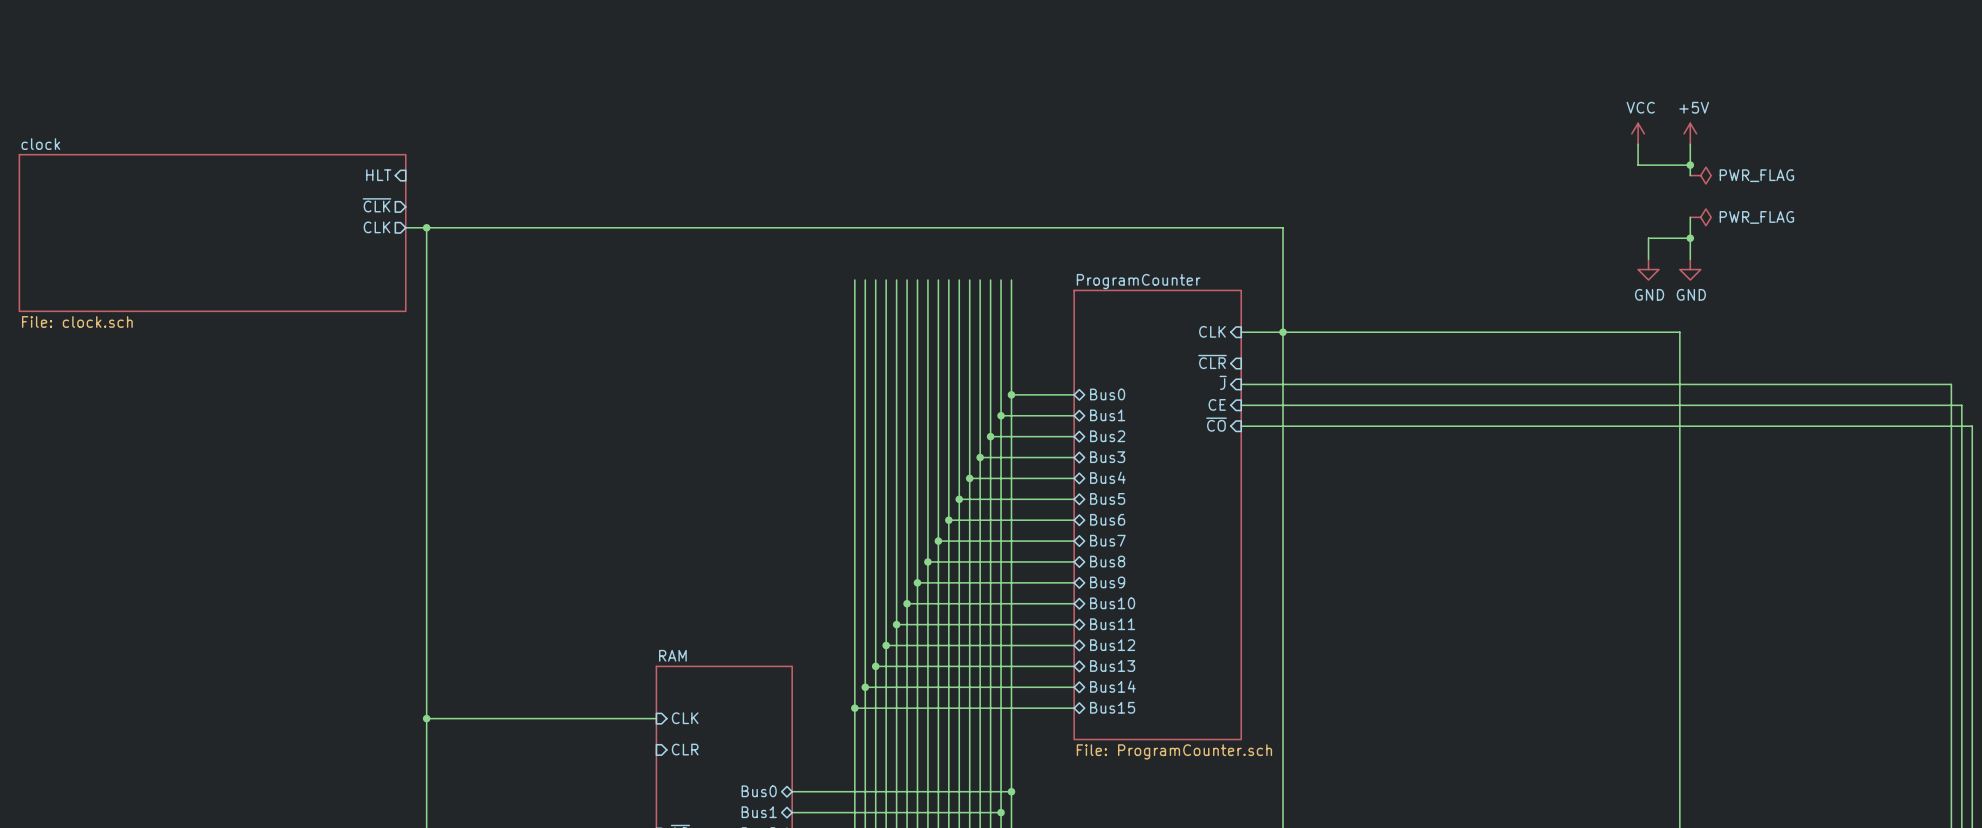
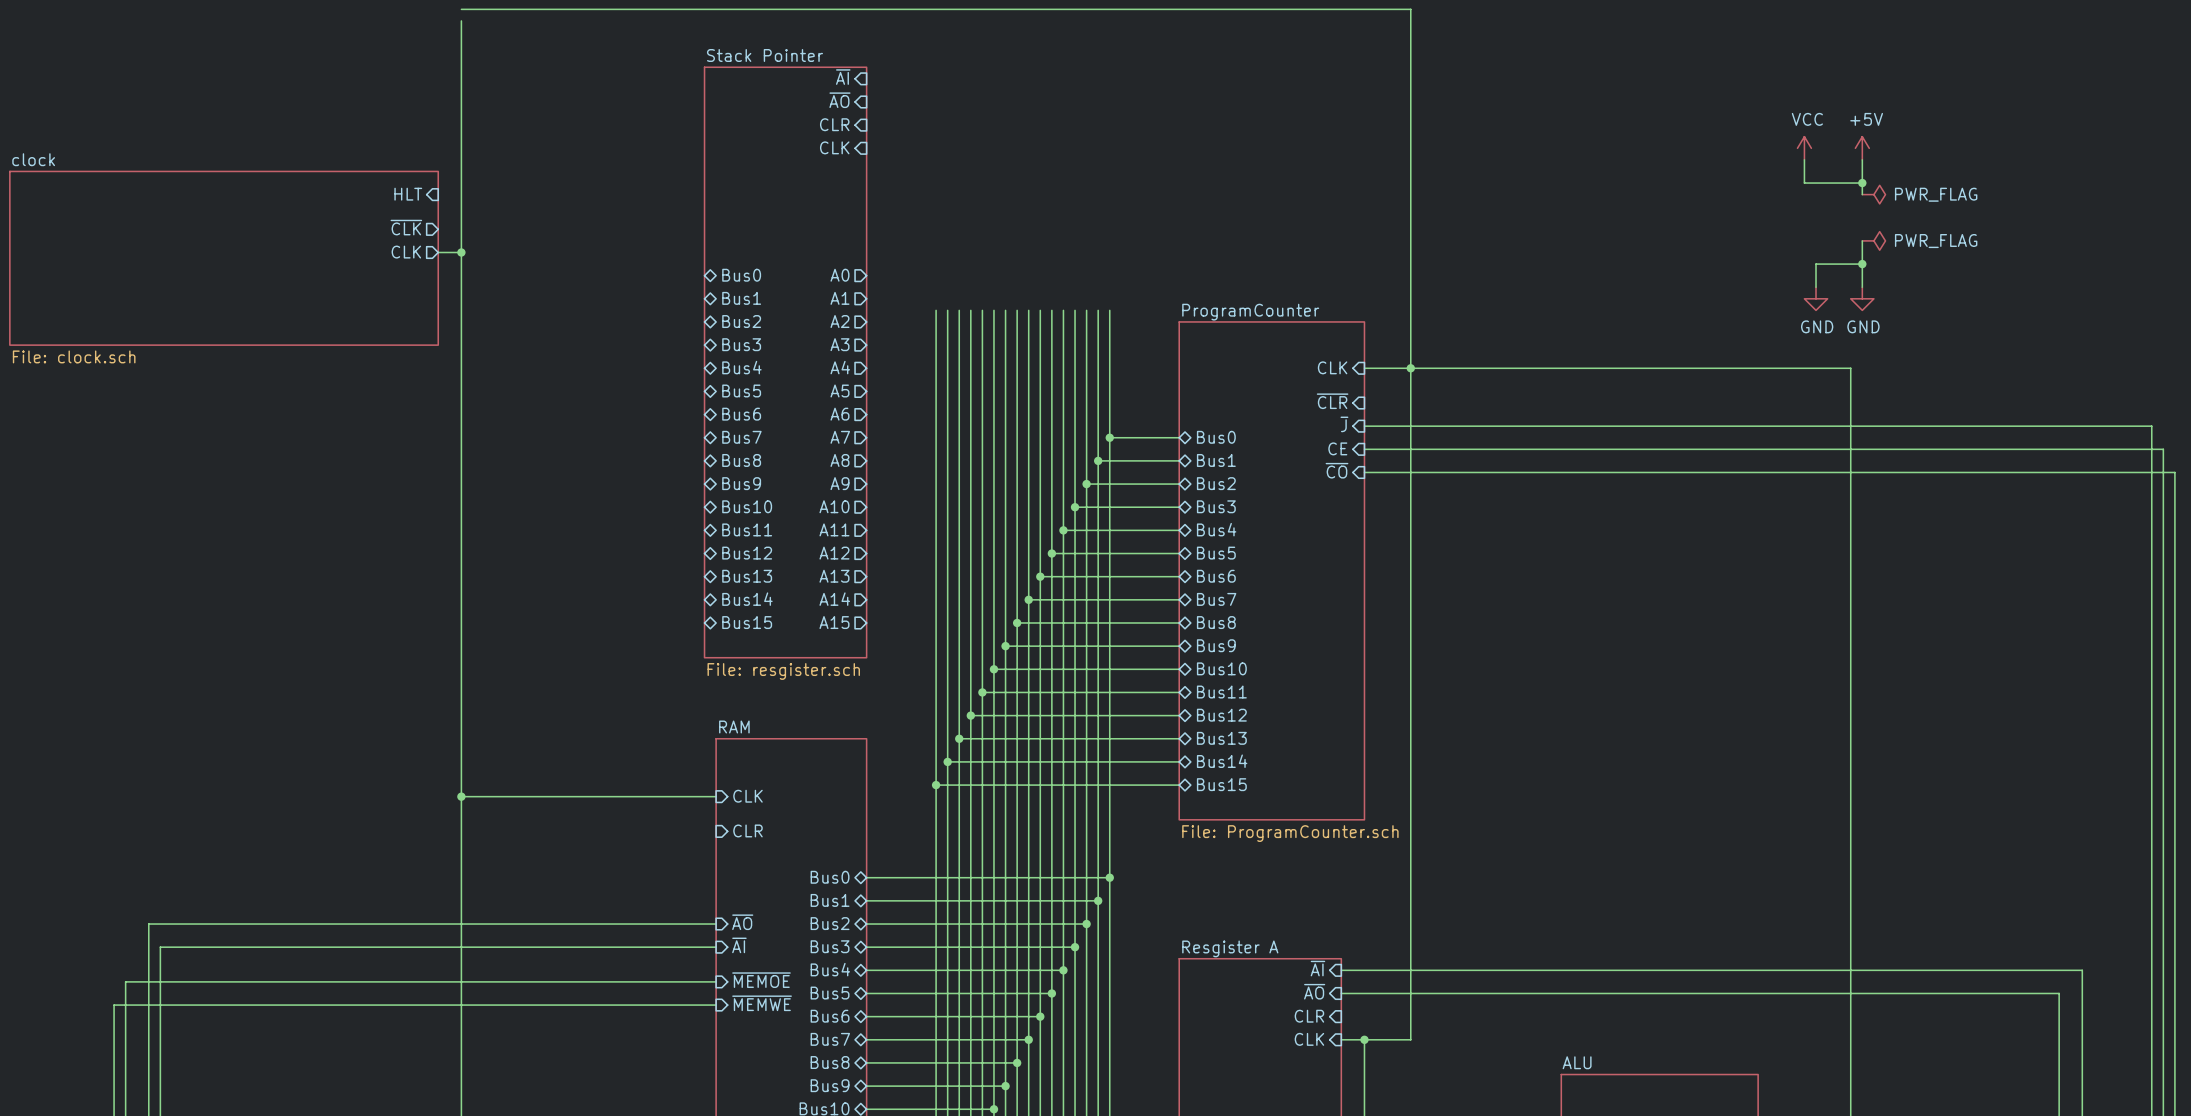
wire: none -> (461, 20) (461, 252)
sheet pin: none -> ~{AI} (843, 77)
sheet pin: none -> ~{AO} (839, 100)
sheet pin: none -> CLR (834, 124)
sheet pin: none -> CLK (834, 147)
wire: (426, 227) (1283, 227) -> (461, 9) (1410, 9) (1410, 252)
sheet pin: none -> Bus0 (741, 275)
sheet pin: none -> A0 (839, 275)
sheet pin: none -> Bus1 (741, 298)
sheet pin: none -> A1 (839, 298)
sheet pin: none -> Bus2 (741, 321)
sheet pin: none -> A2 (839, 321)
sheet pin: none -> Bus3 (741, 344)
sheet pin: none -> A3 (839, 344)
sheet Stack Pointer: none -> File: resgister.sch (785, 362)
sheet pin: none -> Bus4 (741, 367)
sheet pin: none -> A4 (840, 367)
sheet pin: none -> Bus5 (741, 391)
sheet pin: none -> A5 (839, 391)
sheet pin: none -> Bus6 (741, 414)
sheet pin: none -> A6 (839, 414)
sheet pin: none -> Bus7 (741, 437)
sheet pin: none -> A7 (840, 437)
sheet pin: none -> Bus8 (741, 460)
sheet pin: none -> A8 (839, 460)
sheet pin: none -> Bus9 (741, 483)
sheet pin: none -> A9 (839, 483)
sheet pin: none -> Bus10 (747, 506)
sheet pin: none -> A10 (834, 506)
sheet pin: none -> Bus11 (747, 529)
sheet pin: none -> A11 (834, 529)
sheet pin: none -> Bus12 (747, 553)
sheet pin: none -> A12 (834, 553)
sheet pin: none -> Bus13 (747, 576)
sheet pin: none -> A13 (834, 576)
sheet pin: none -> Bus14 (747, 599)
sheet pin: none -> A14 (834, 599)
sheet pin: none -> Bus15 (747, 622)
sheet pin: none -> A15 (834, 622)

